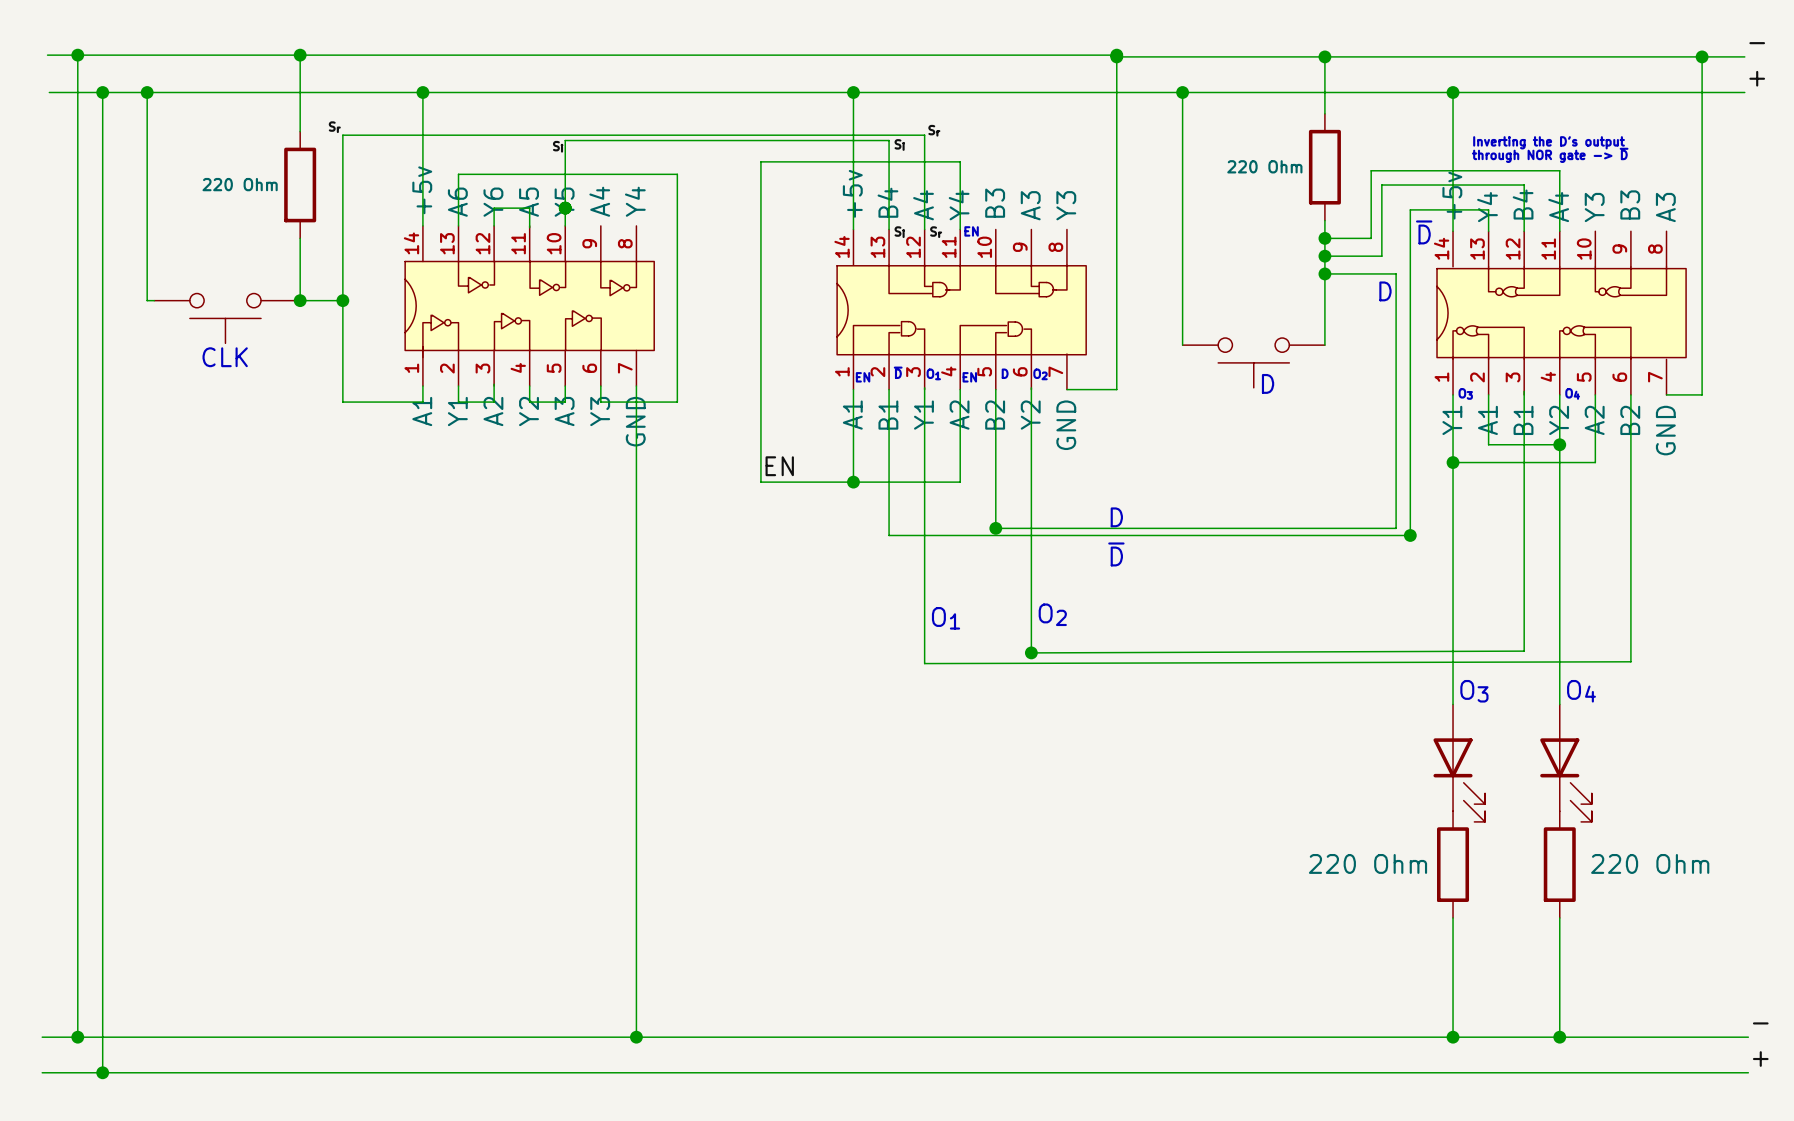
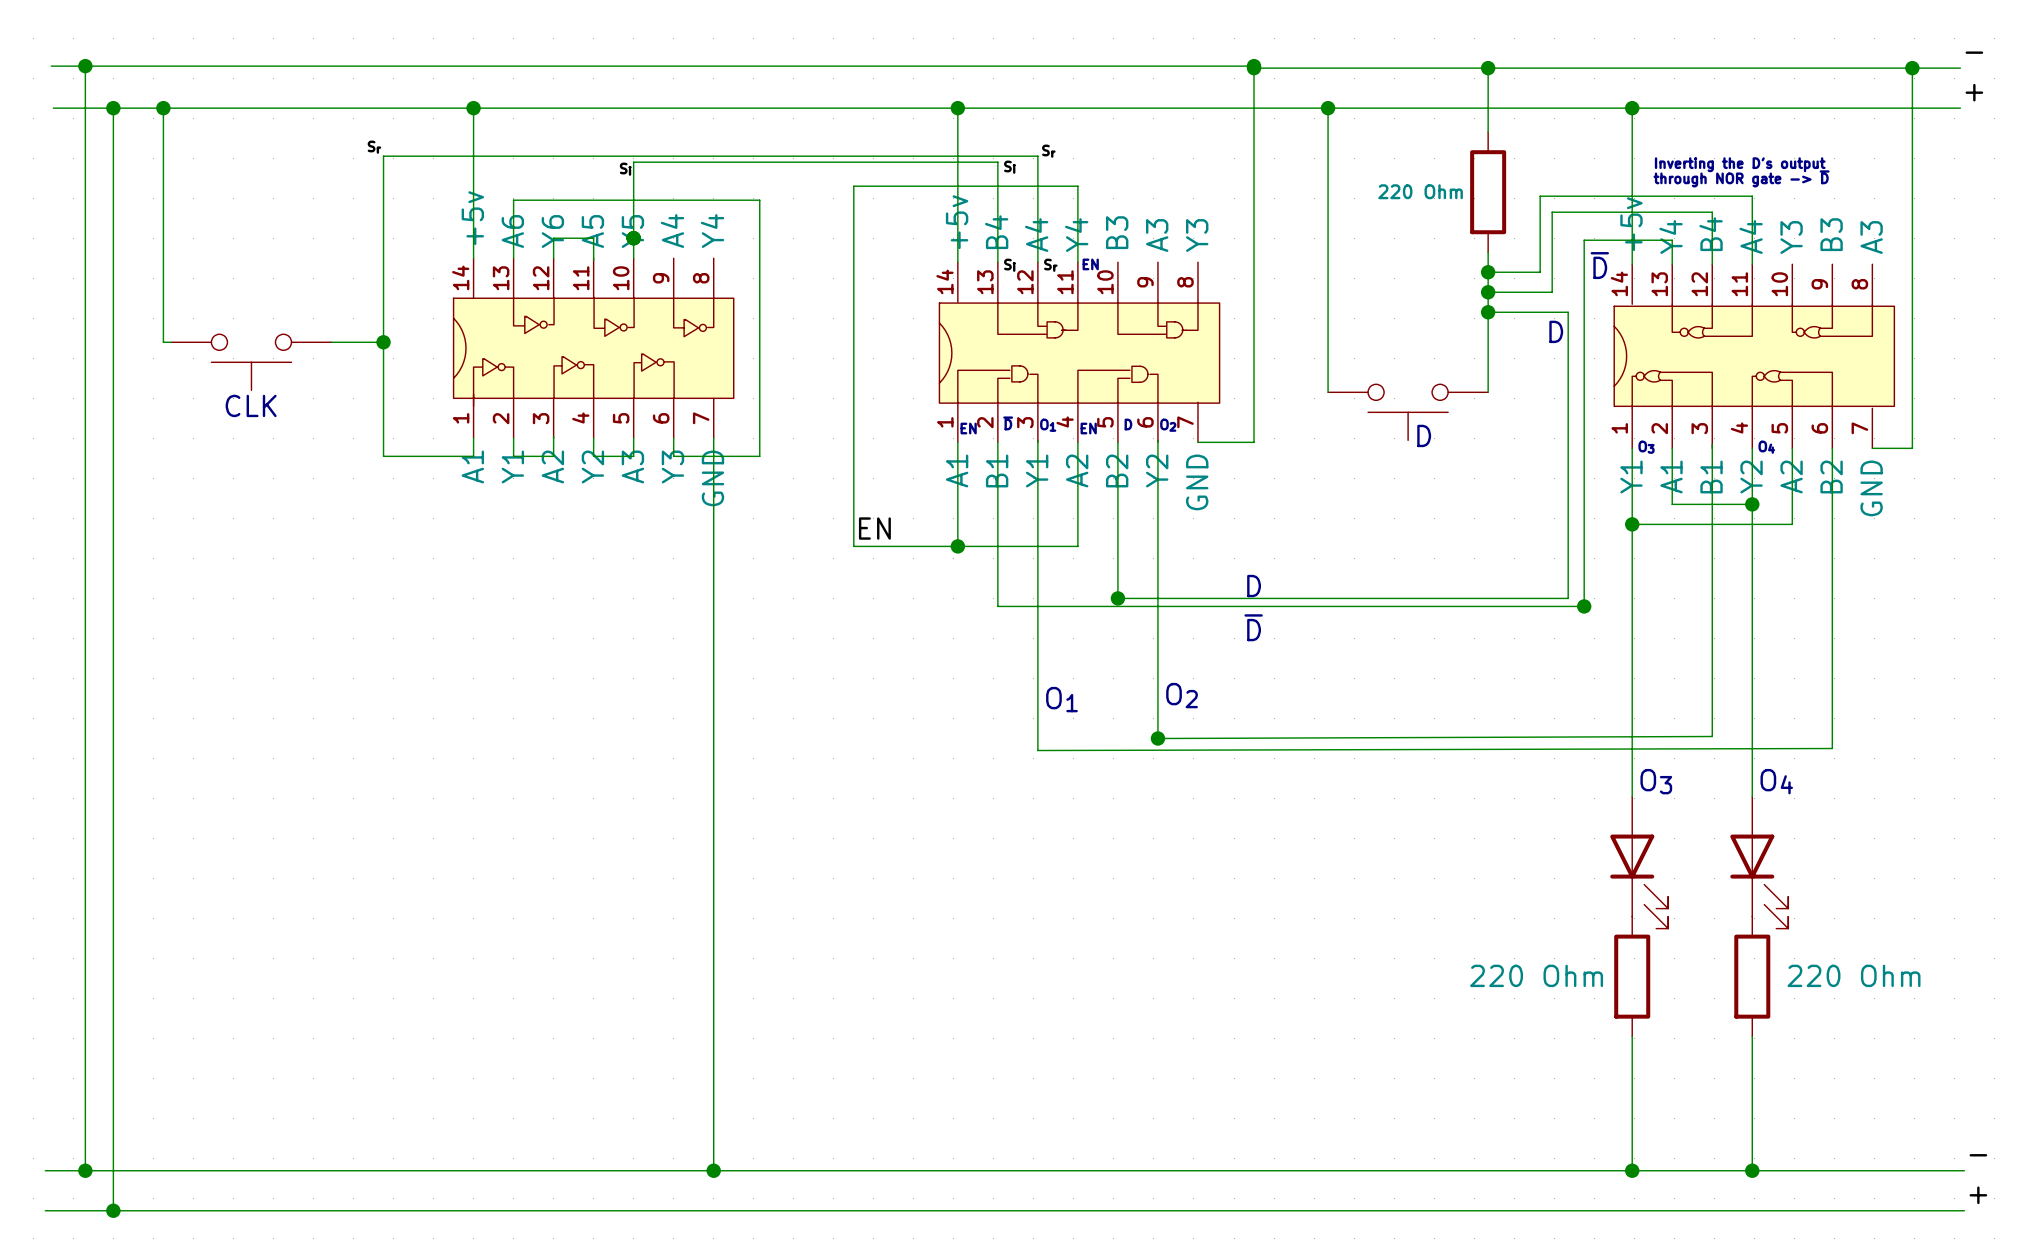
wire: (300, 55) (300, 131) -> none
junction: (300, 55) -> none
part: 220 Ohm (300, 185) -> none
wire: (300, 238) (300, 300) -> none
junction: (300, 300) -> none

